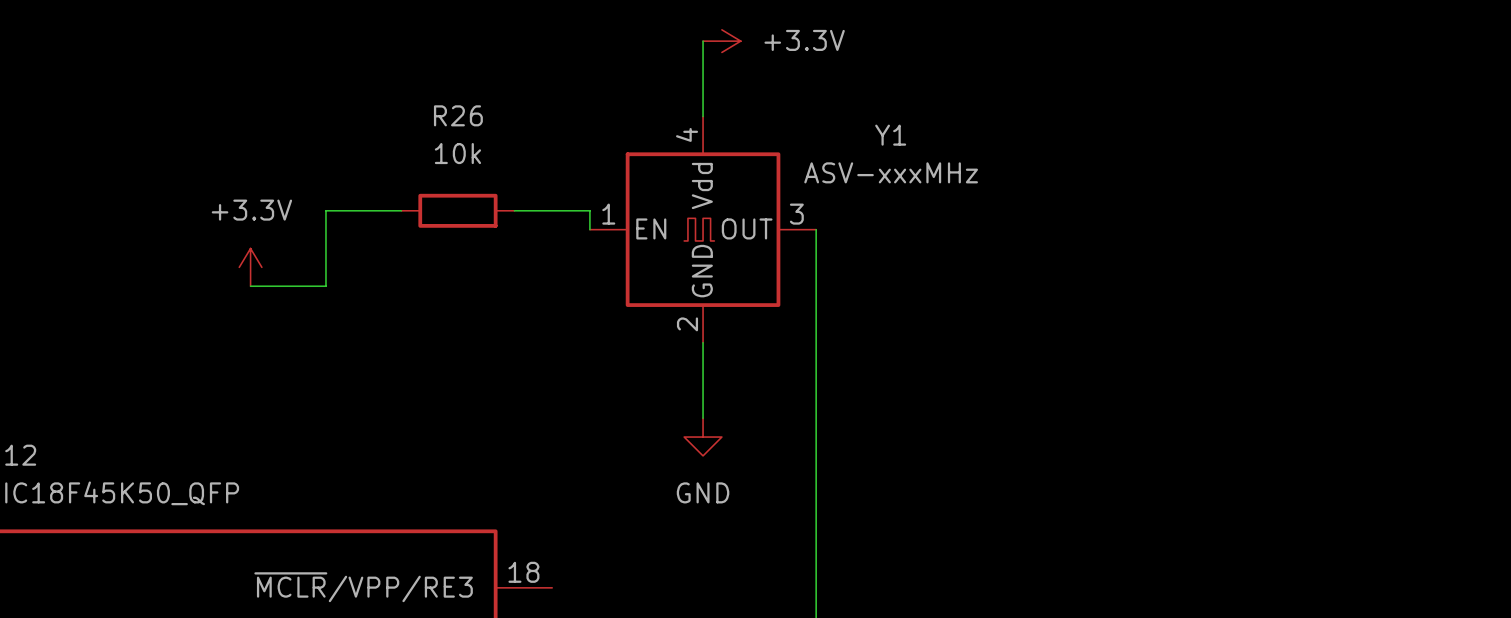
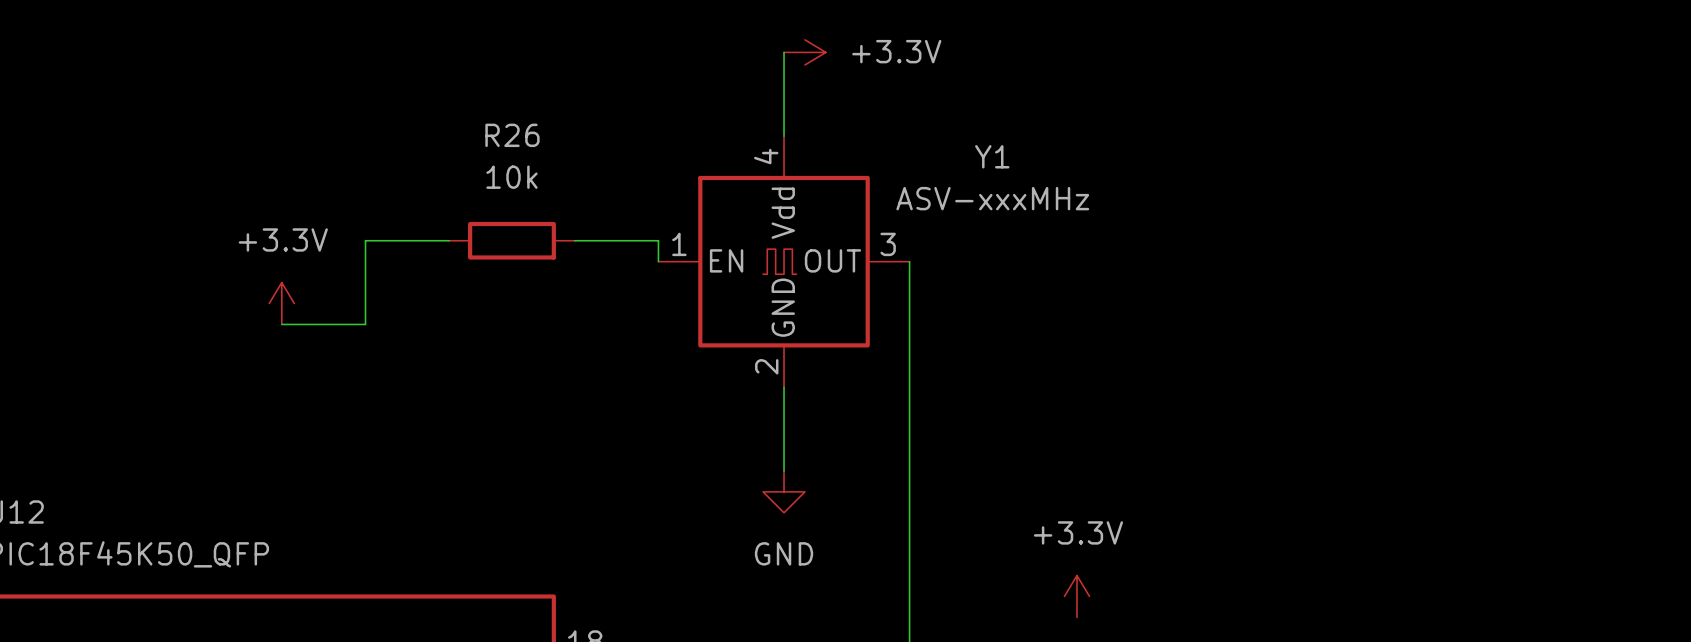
power symbol: none -> +3.3V (1076, 596)

